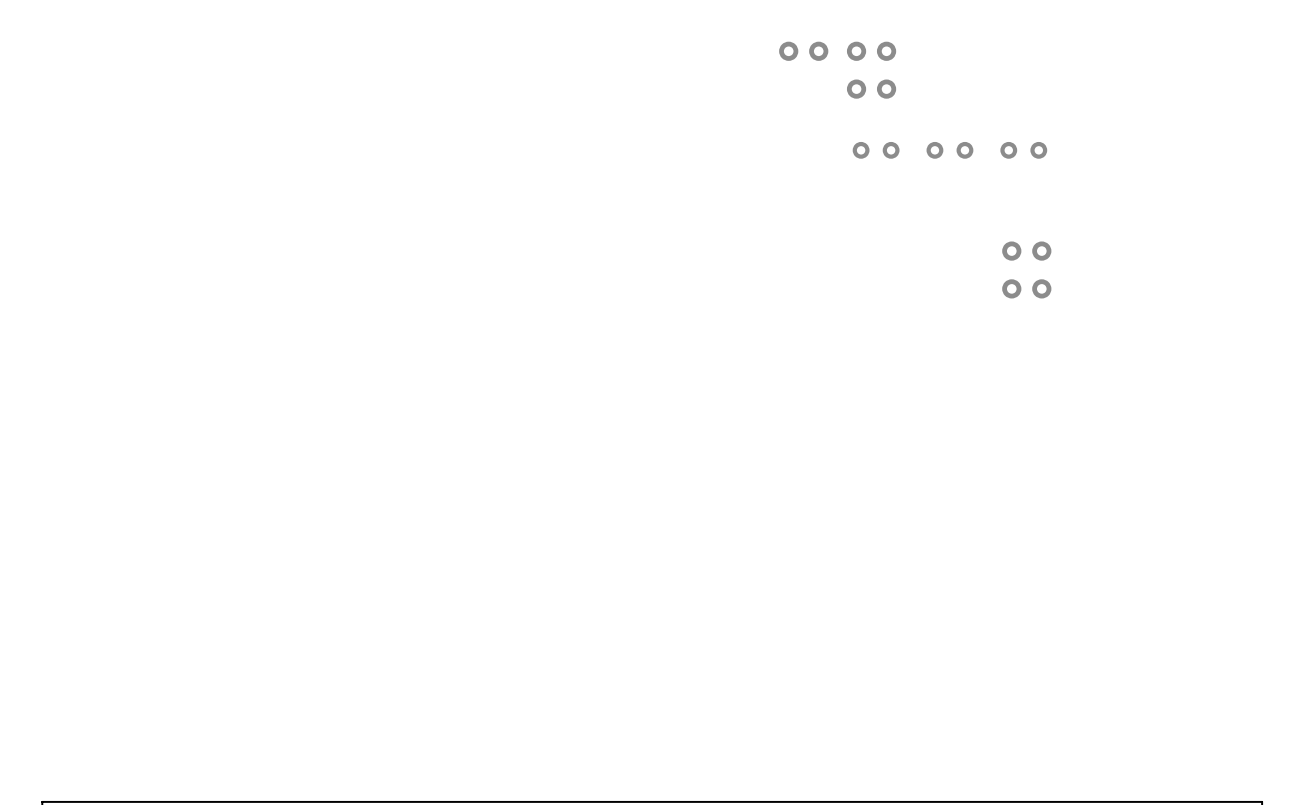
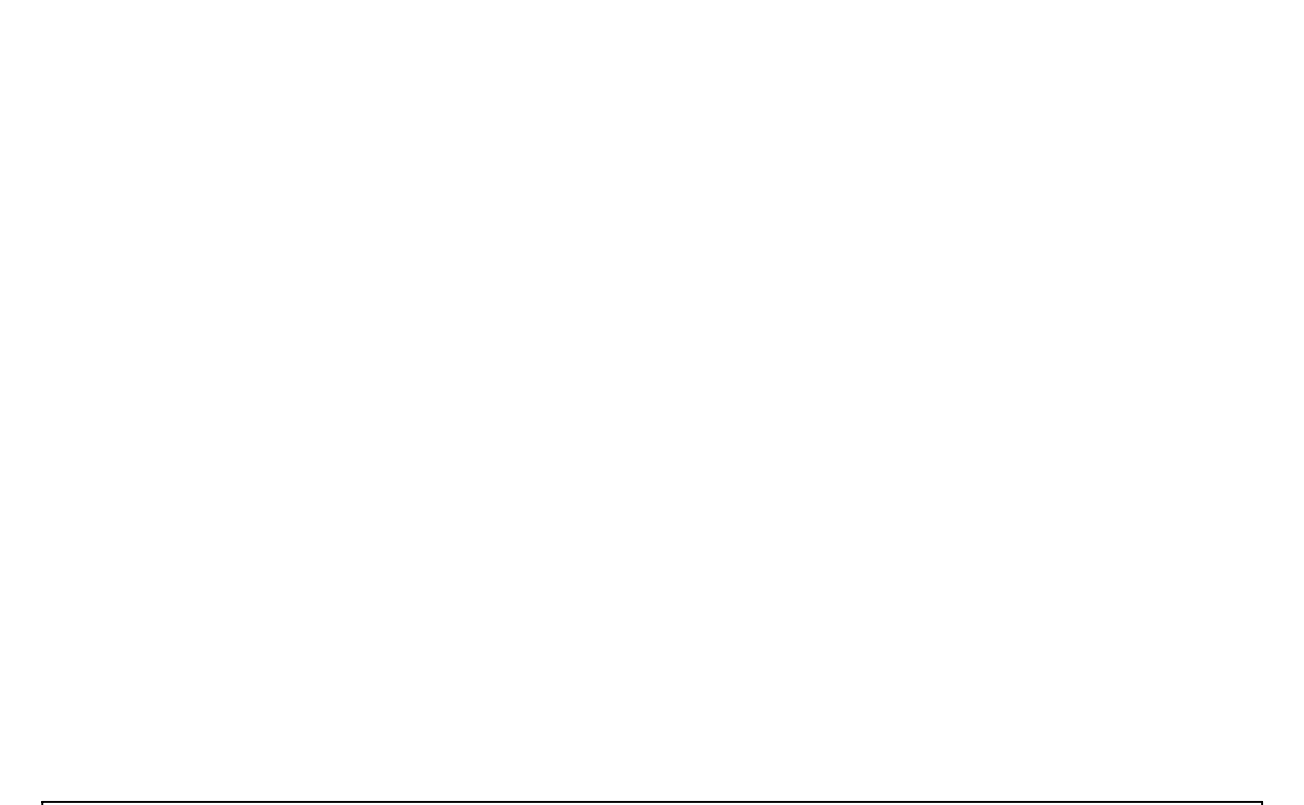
part: (803, 51) -> none
part: (871, 51) -> none
part: (871, 89) -> none
part: (876, 150) -> none
part: (949, 150) -> none
part: (1023, 150) -> none
part: (1026, 251) -> none
part: (1026, 288) -> none

